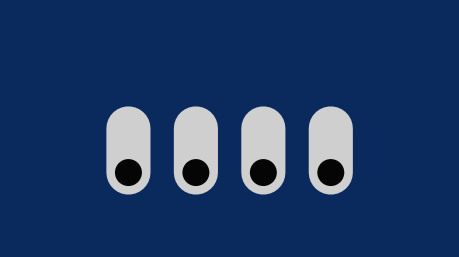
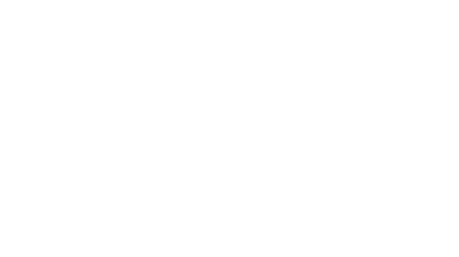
part: (229, 150) -> none

